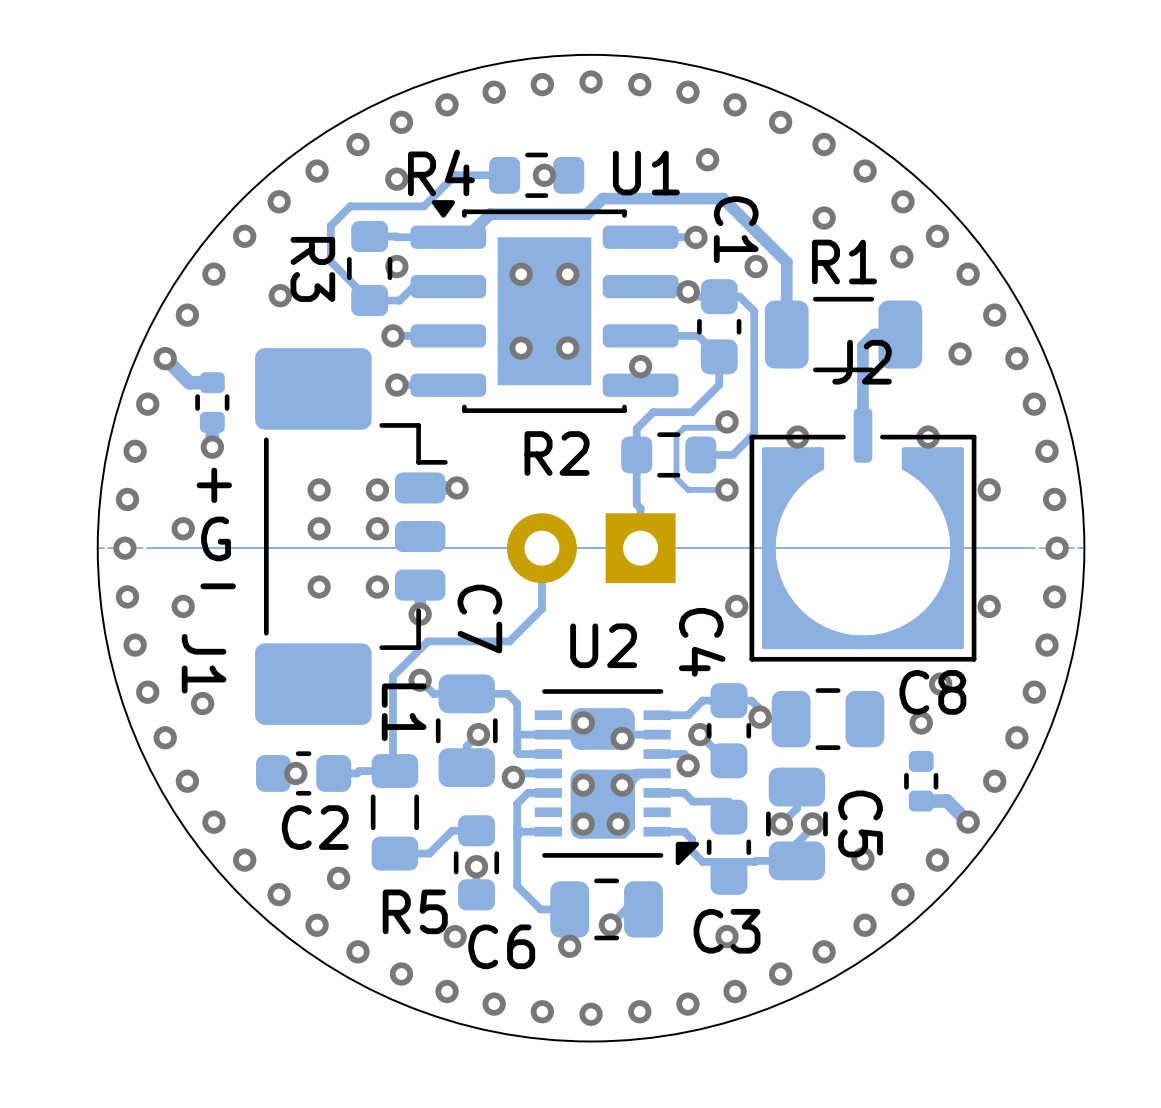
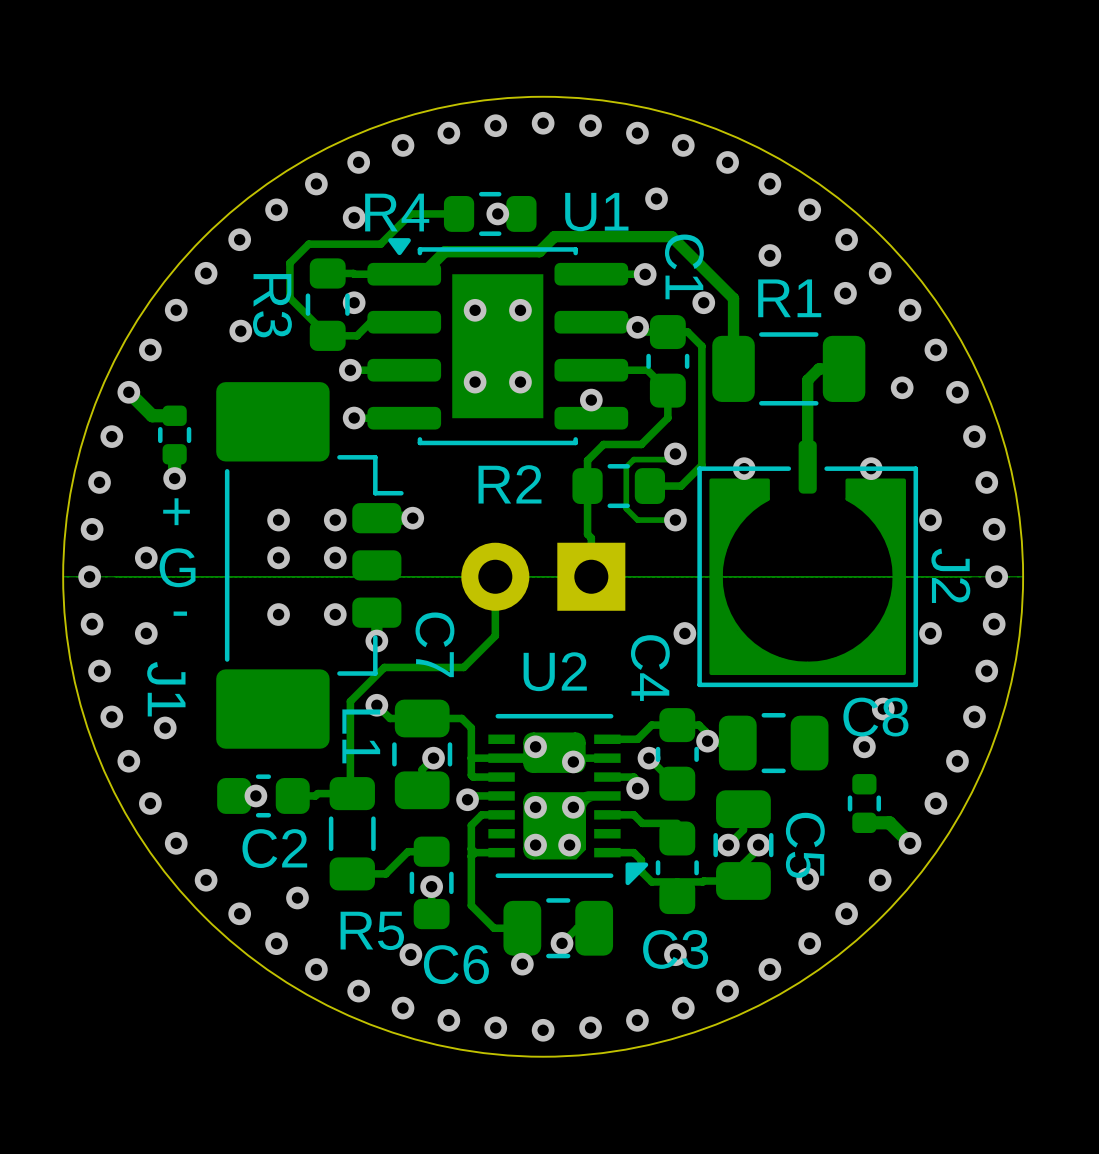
J2 name rotation: 0° (862, 362) -> 90° clockwise (950, 575)
J2 name position: J2 (862, 362) -> J2 (950, 575)

